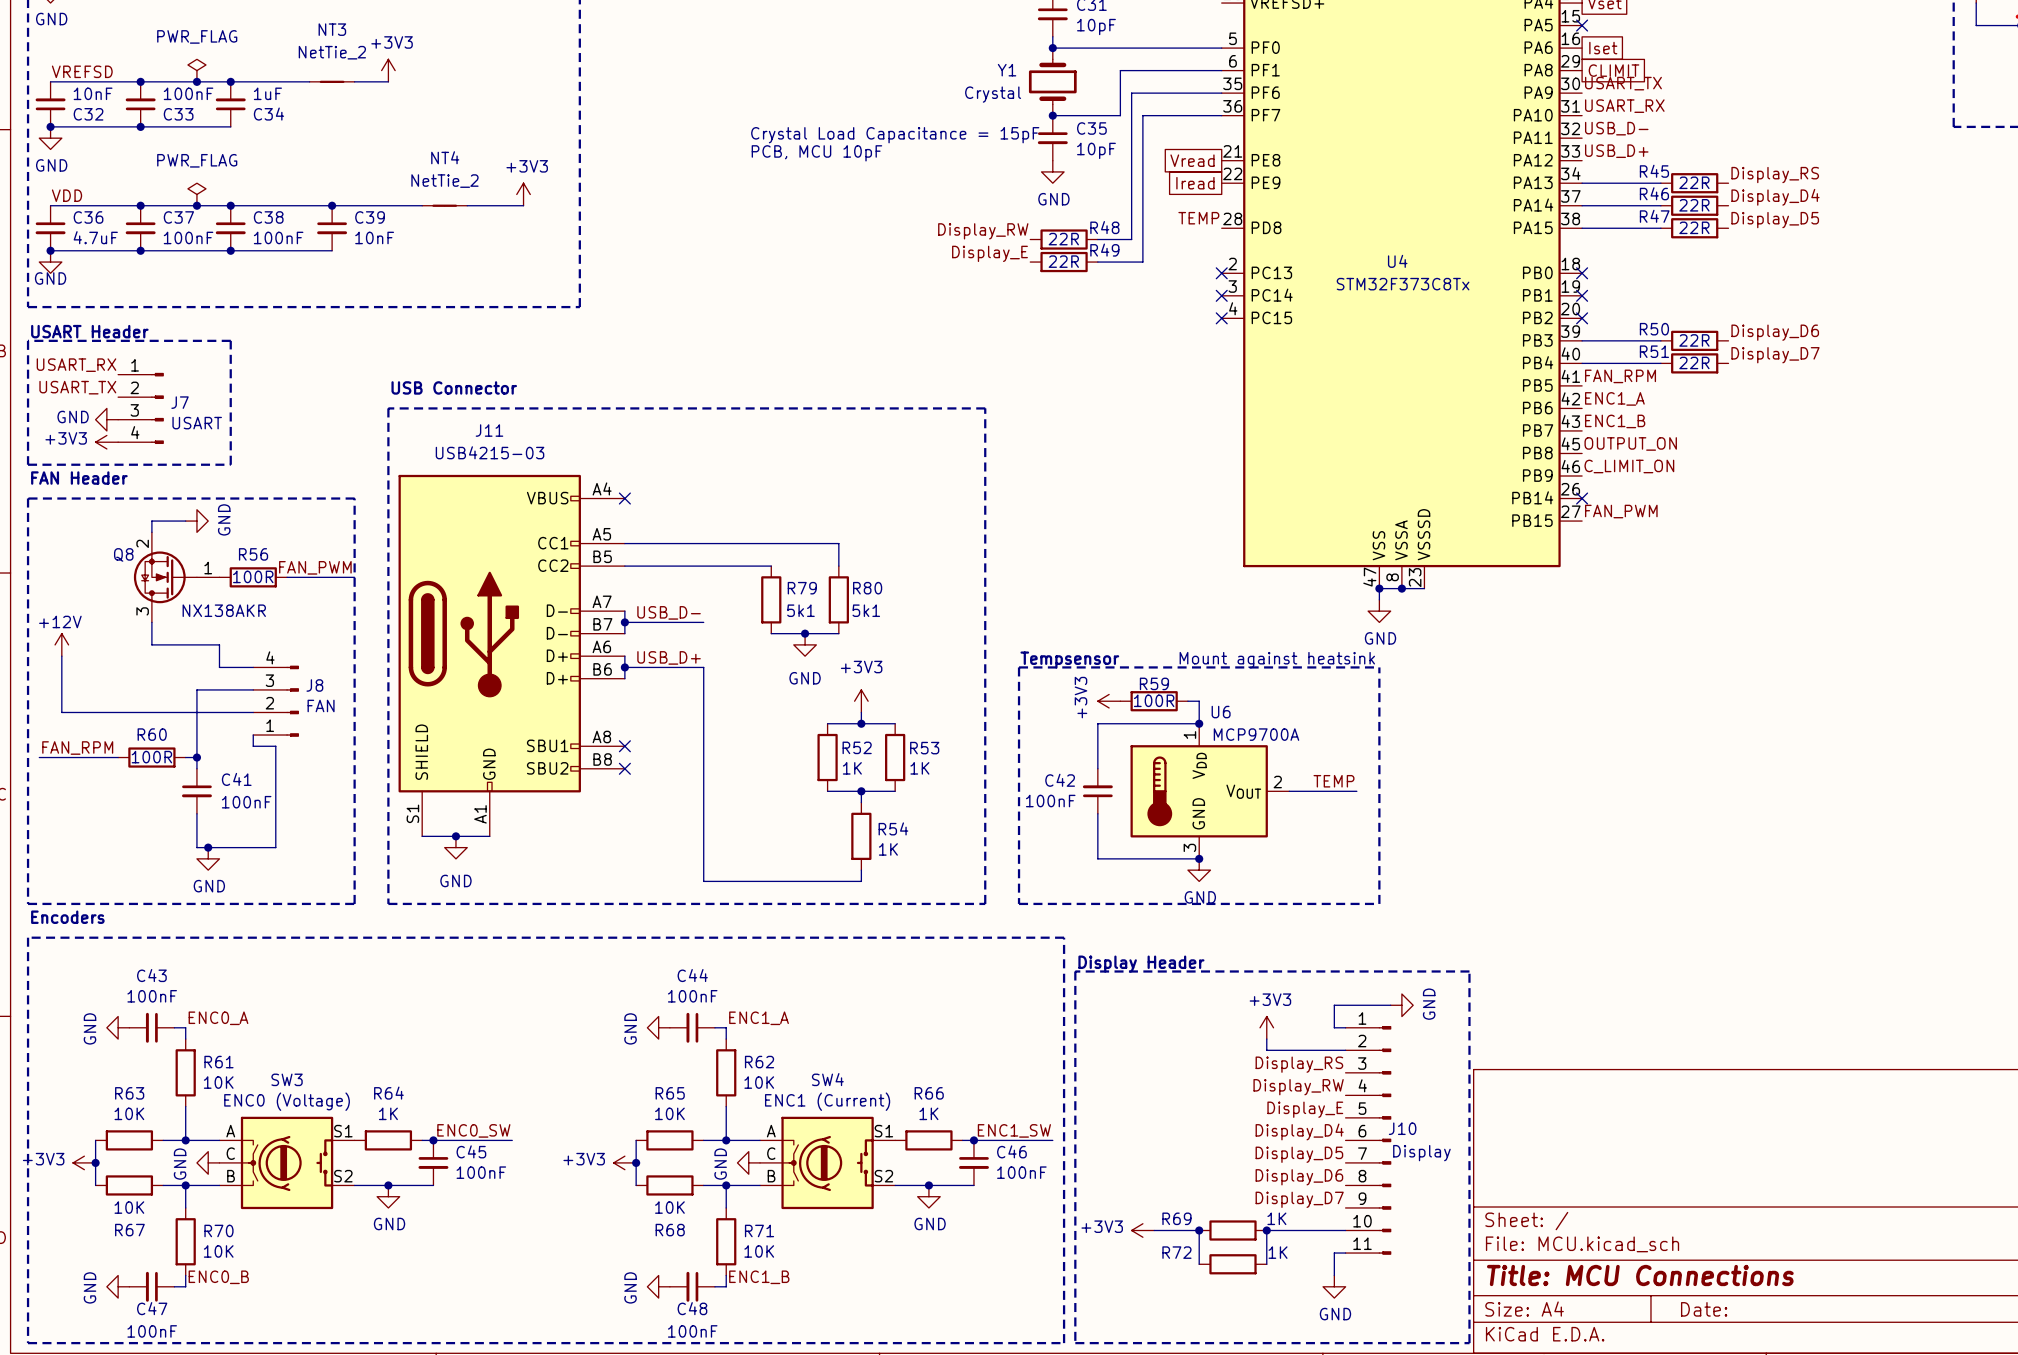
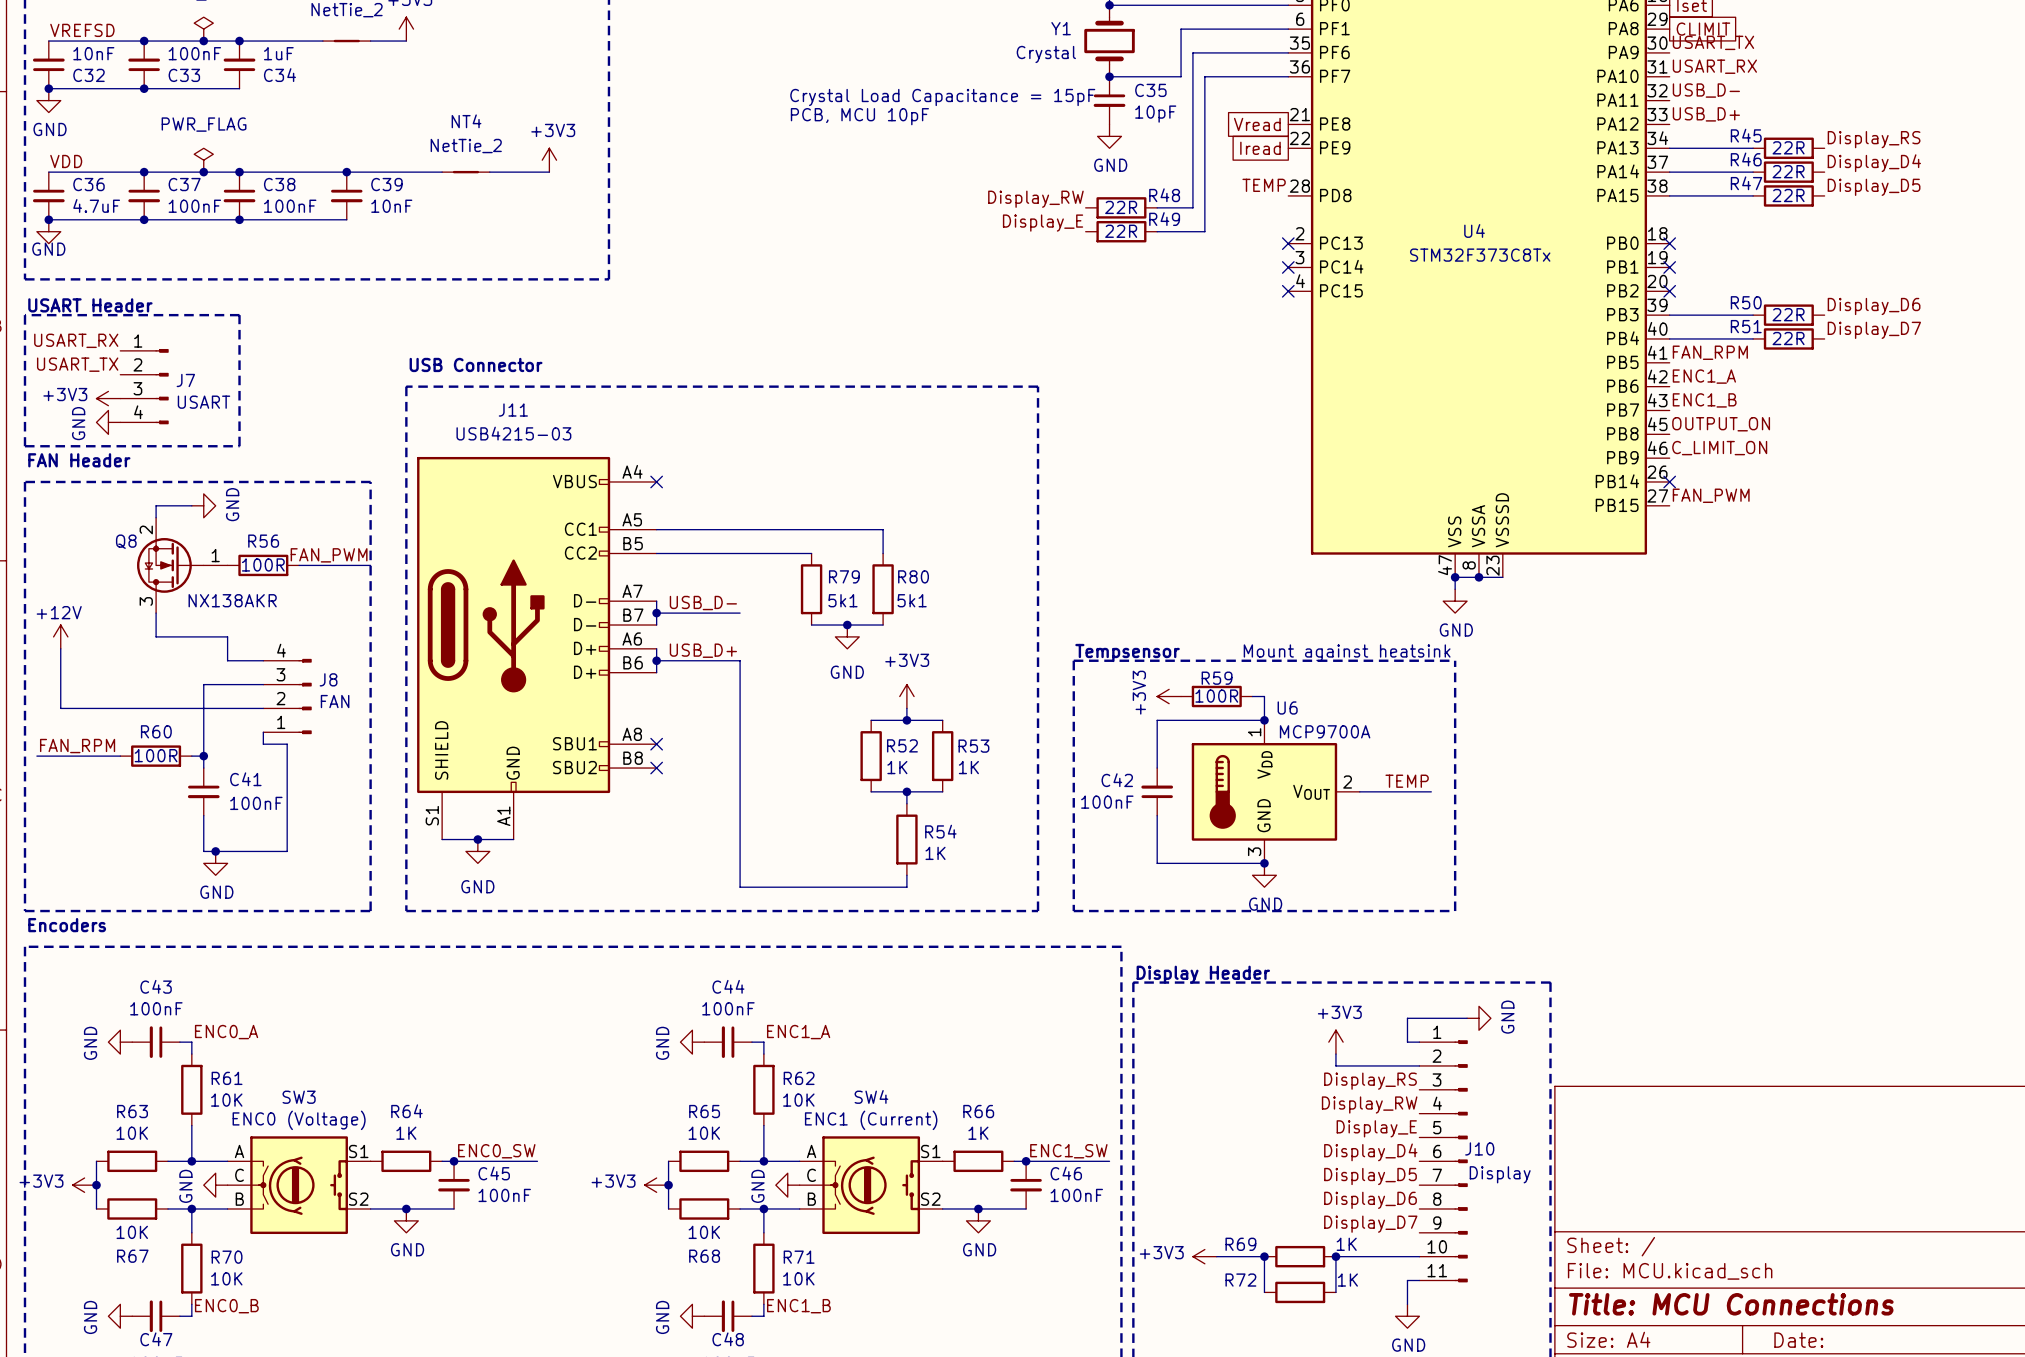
power symbol: GND (106, 419) -> +3V3 (108, 398)
power symbol: +3V3 (106, 442) -> GND (108, 422)

